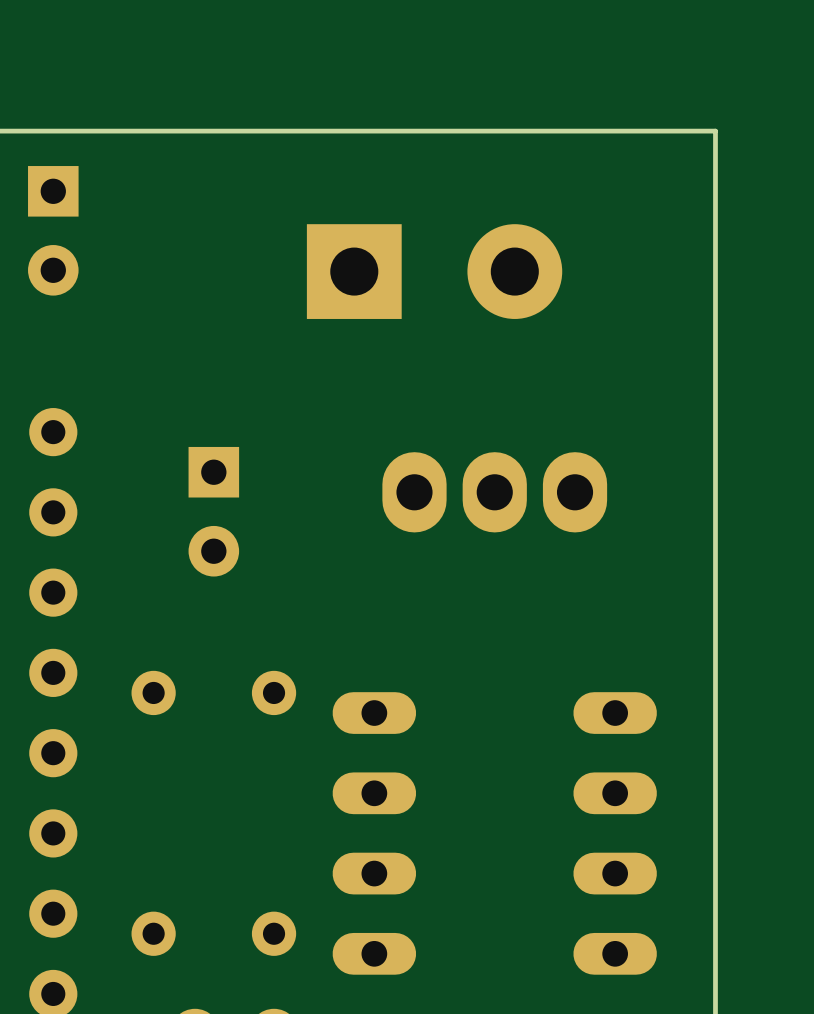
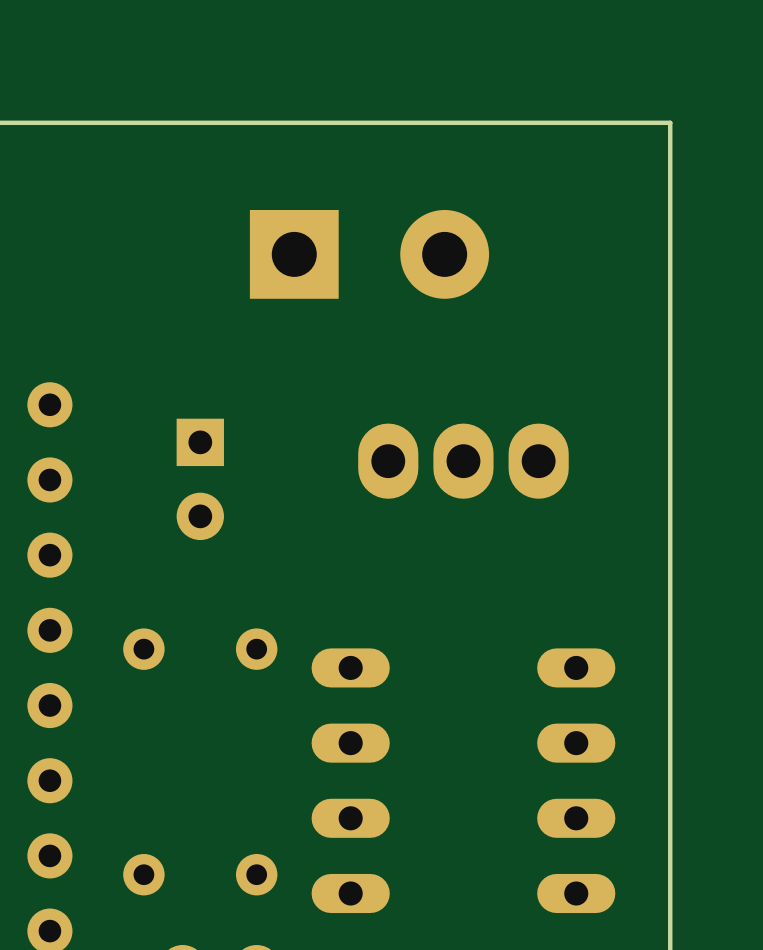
part: (53, 230) -> none
part position: (434, 271) -> (369, 254)

